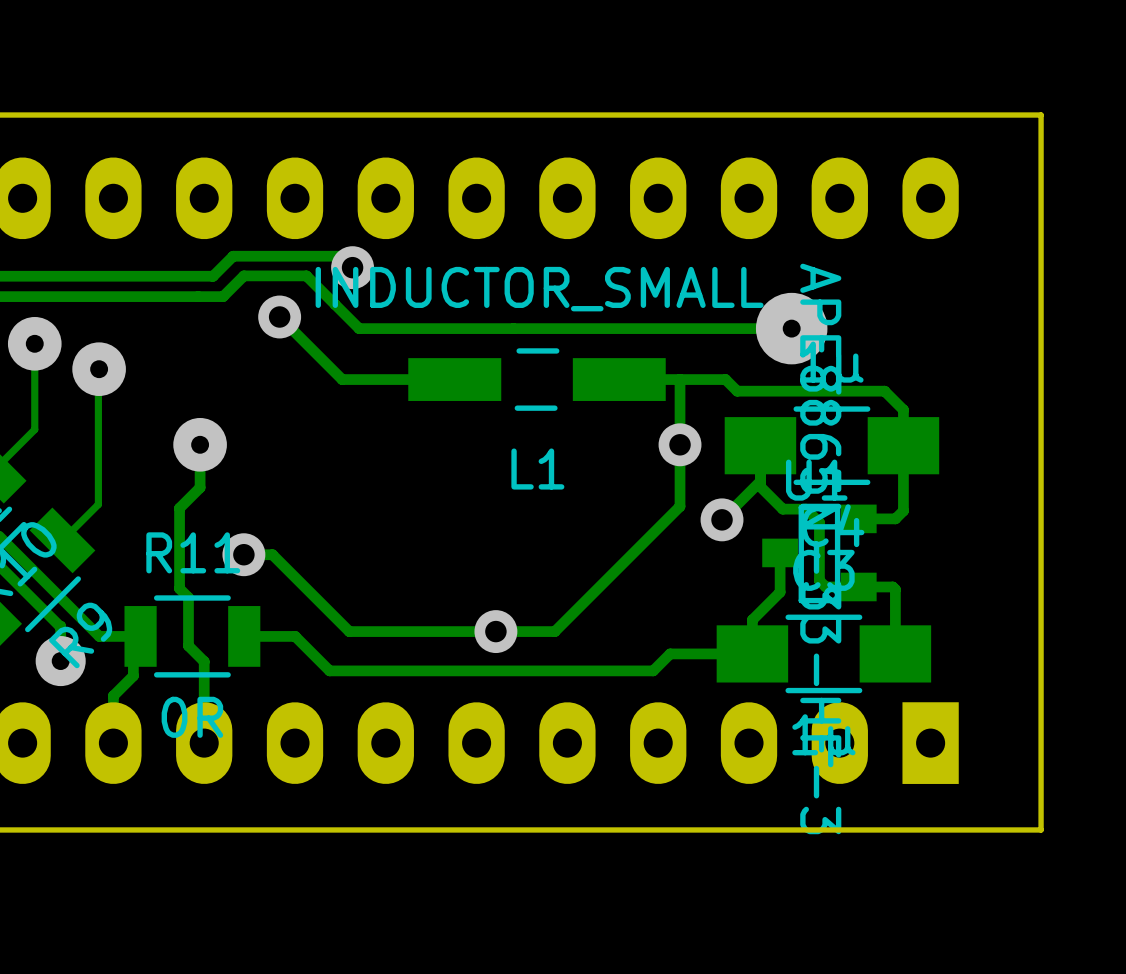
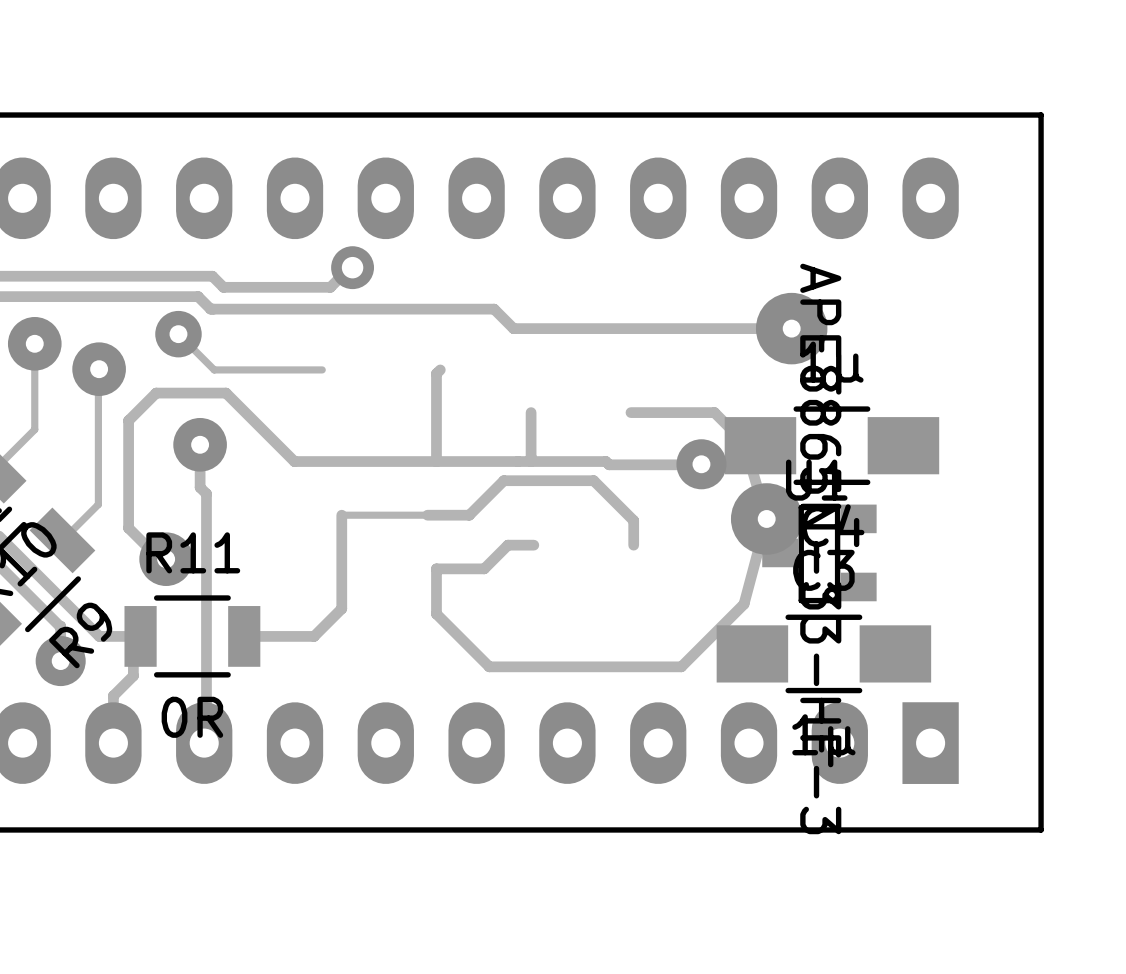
track: (352, 267) (341, 256) (233, 256) (213, 276) -> (350, 267) (330, 287) (223, 287) (212, 276)
track: (198, 296) (223, 296) (243, 275) (306, 275) (359, 328) (513, 328) -> (198, 296) (210, 309) (494, 309) (513, 328)
track: (279, 316) (342, 379) (454, 379) -> none
via: (279, 316) -> none
track: none -> (178, 334) (214, 369) (322, 369)
via: none -> (178, 334)
track: none -> (440, 369) (436, 373) (436, 461)
L1: INDUCTOR_SMALL (537, 379) -> none
track: (619, 379) (725, 379) (737, 391) (884, 391) (903, 409) (903, 510) (895, 518) (858, 518) -> none
track: (680, 379) (680, 506) (554, 631) (349, 631) (272, 554) (240, 554) -> none
track: none -> (531, 412) (531, 461)
track: none -> (630, 412) (714, 412) (744, 442) (766, 518) (744, 604) (681, 666) (489, 666) (436, 613) (436, 568) (484, 568) (507, 545) (533, 545)
track: (200, 444) (200, 487) (179, 508) (179, 588) (188, 597) (188, 645) (204, 661) (204, 743) -> (200, 444) (200, 487) (206, 493) (206, 740)
via position: (680, 444) -> (701, 464)
track: (760, 445) (760, 486) (782, 509) (806, 509) (819, 522) (819, 580) (825, 586) (892, 586) (895, 589) (895, 653) -> none
track: none -> (701, 464) (609, 464) (605, 461) (294, 461) (226, 393) (156, 393) (128, 420) (128, 528) (159, 559) (166, 559)
track: (760, 481) (722, 519) -> none
via: none -> (766, 518)
via: (722, 519) -> none
track: (780, 552) (780, 592) (752, 619) (752, 653) (670, 653) (653, 670) (329, 670) (295, 636) -> (633, 545) (633, 520) (593, 480) (503, 480) (469, 515) (341, 515) (341, 608) (314, 636) (295, 636)
via: (243, 554) -> none
via: none -> (166, 559)
via: (495, 631) -> none

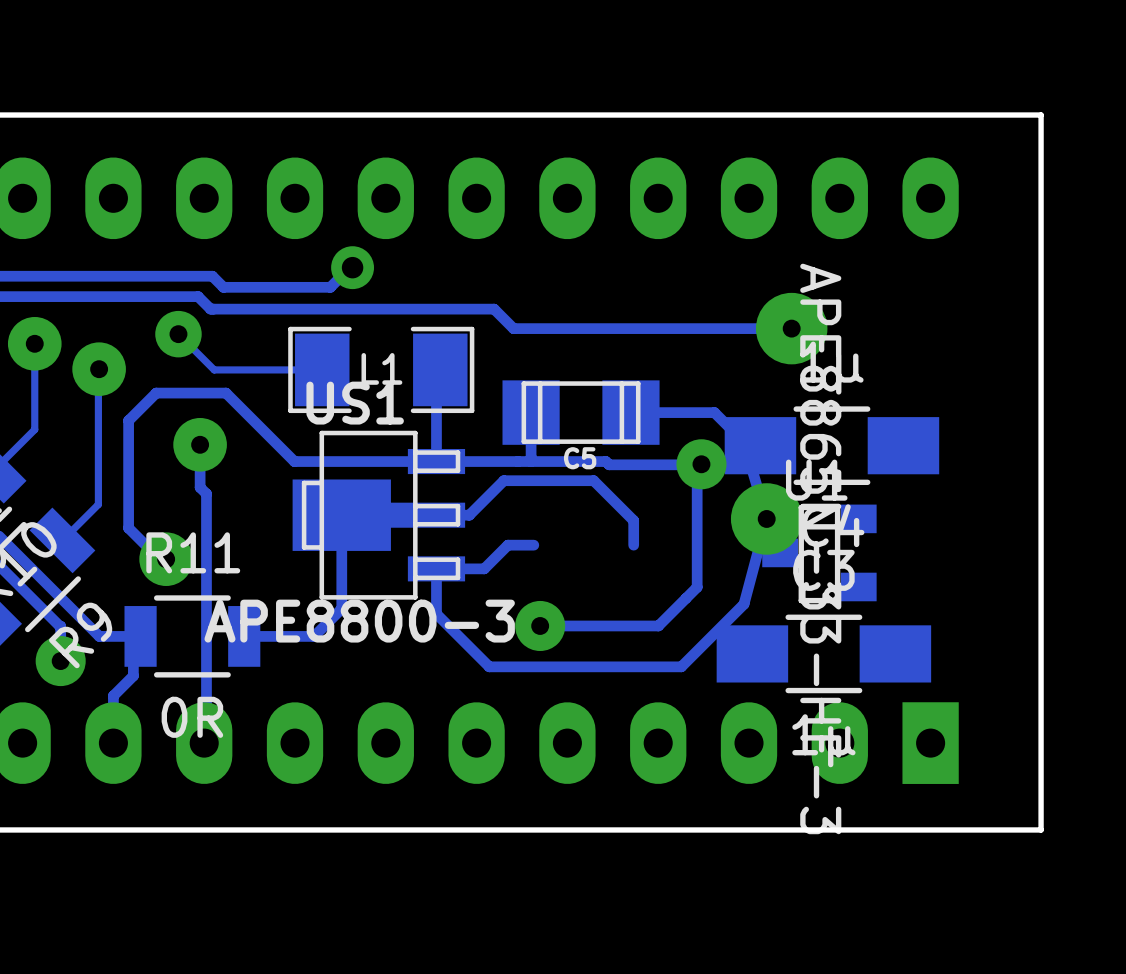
L1: none -> (381, 369)
C5: none -> (581, 412)
track: none -> (700, 464) (697, 468) (697, 587) (658, 625) (540, 625)
US1: none -> APE8800-3 (378, 515)
via: none -> (540, 625)

